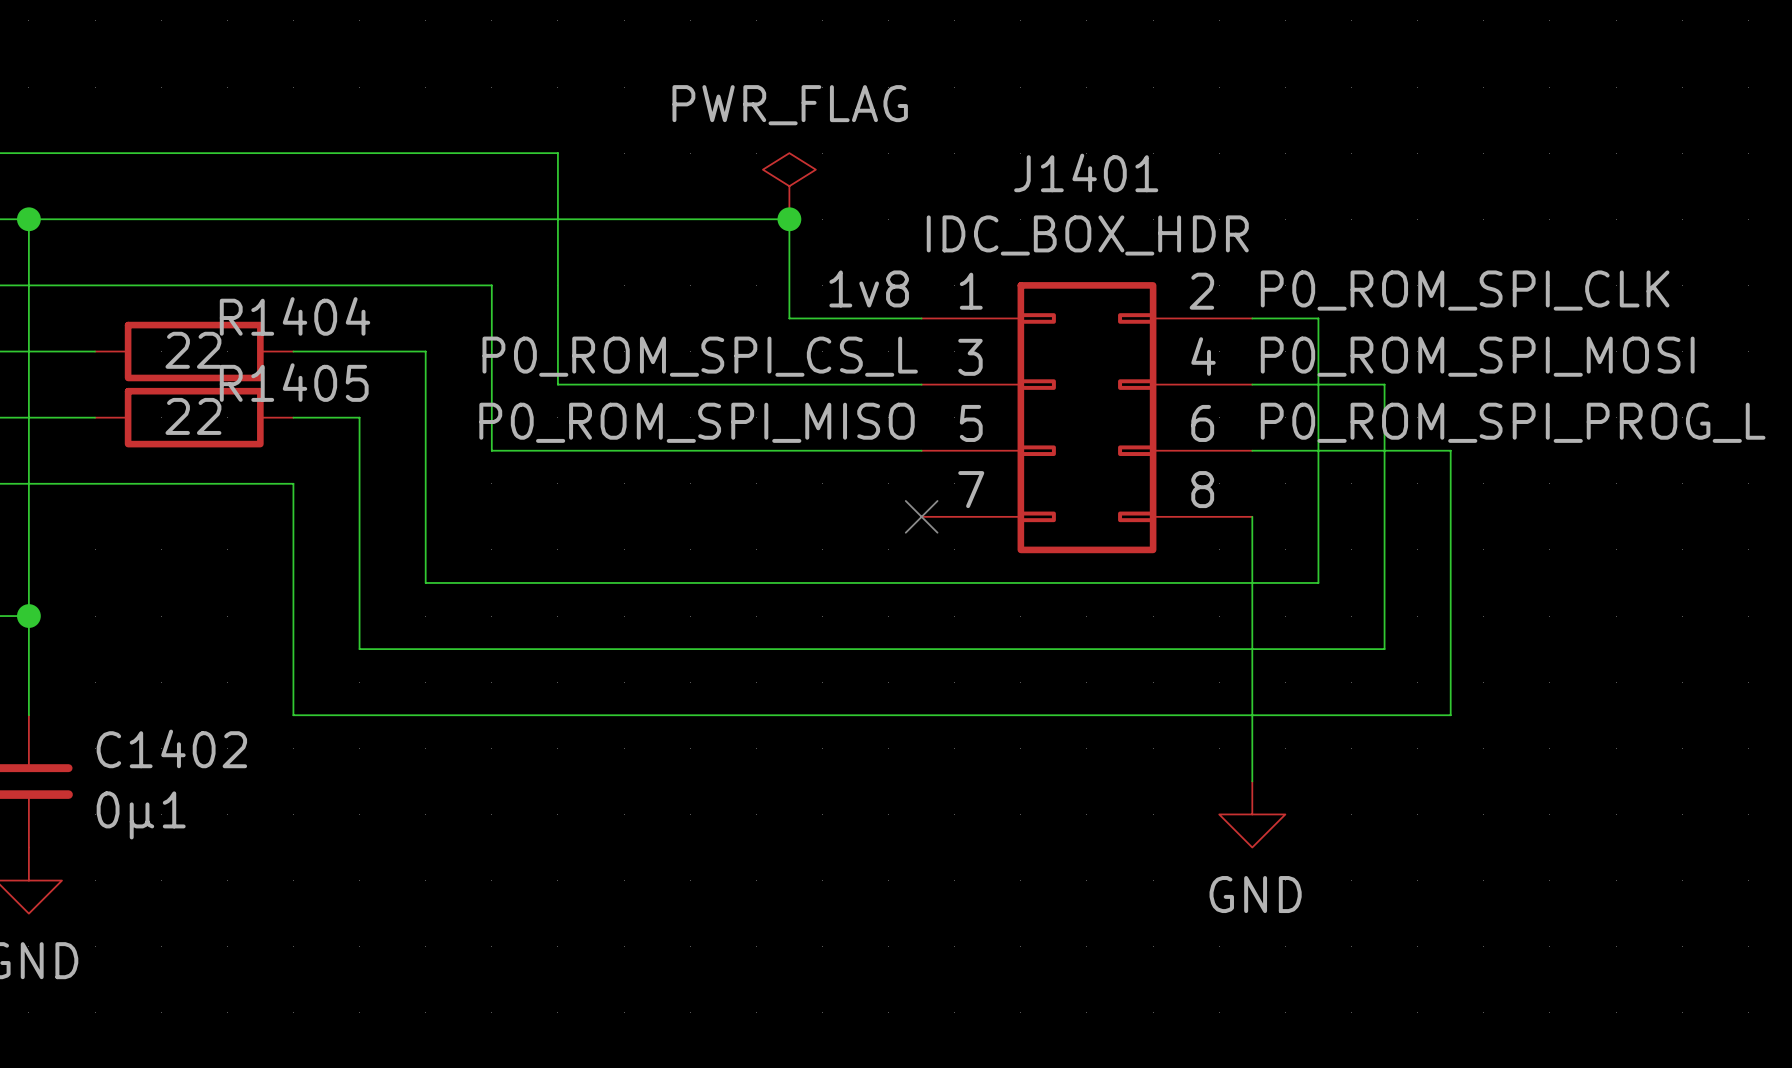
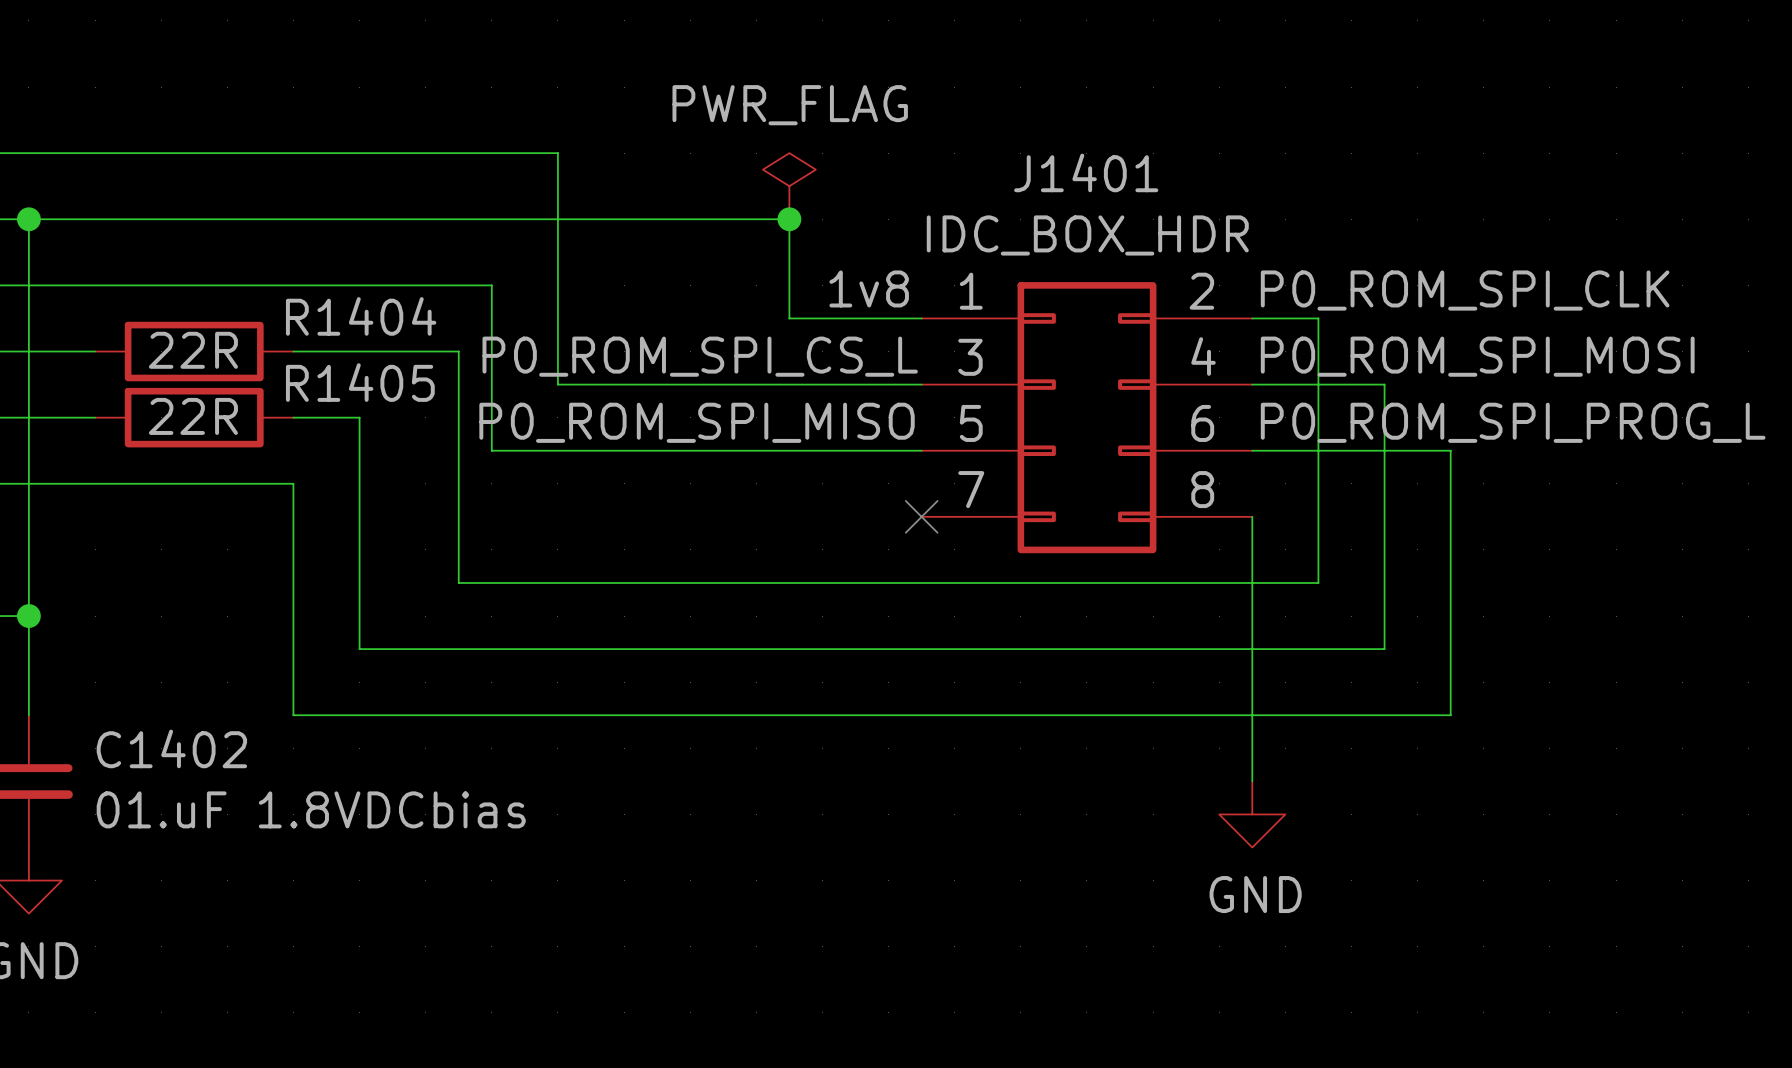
R1404 name position: R1404 (295, 316) -> R1404 (361, 316)
R1404 value: 22 (193, 350) -> 22R (193, 350)
wire: (425, 351) (425, 582) (458, 582) -> (425, 351) (458, 351) (458, 582)
R1405 name position: R1405 (294, 382) -> R1405 (360, 382)
R1405 value: 22 (193, 416) -> 22R (193, 416)
C1402 value: 0µ1 (141, 815) -> 01.uF 1.8VDCbias (311, 809)

